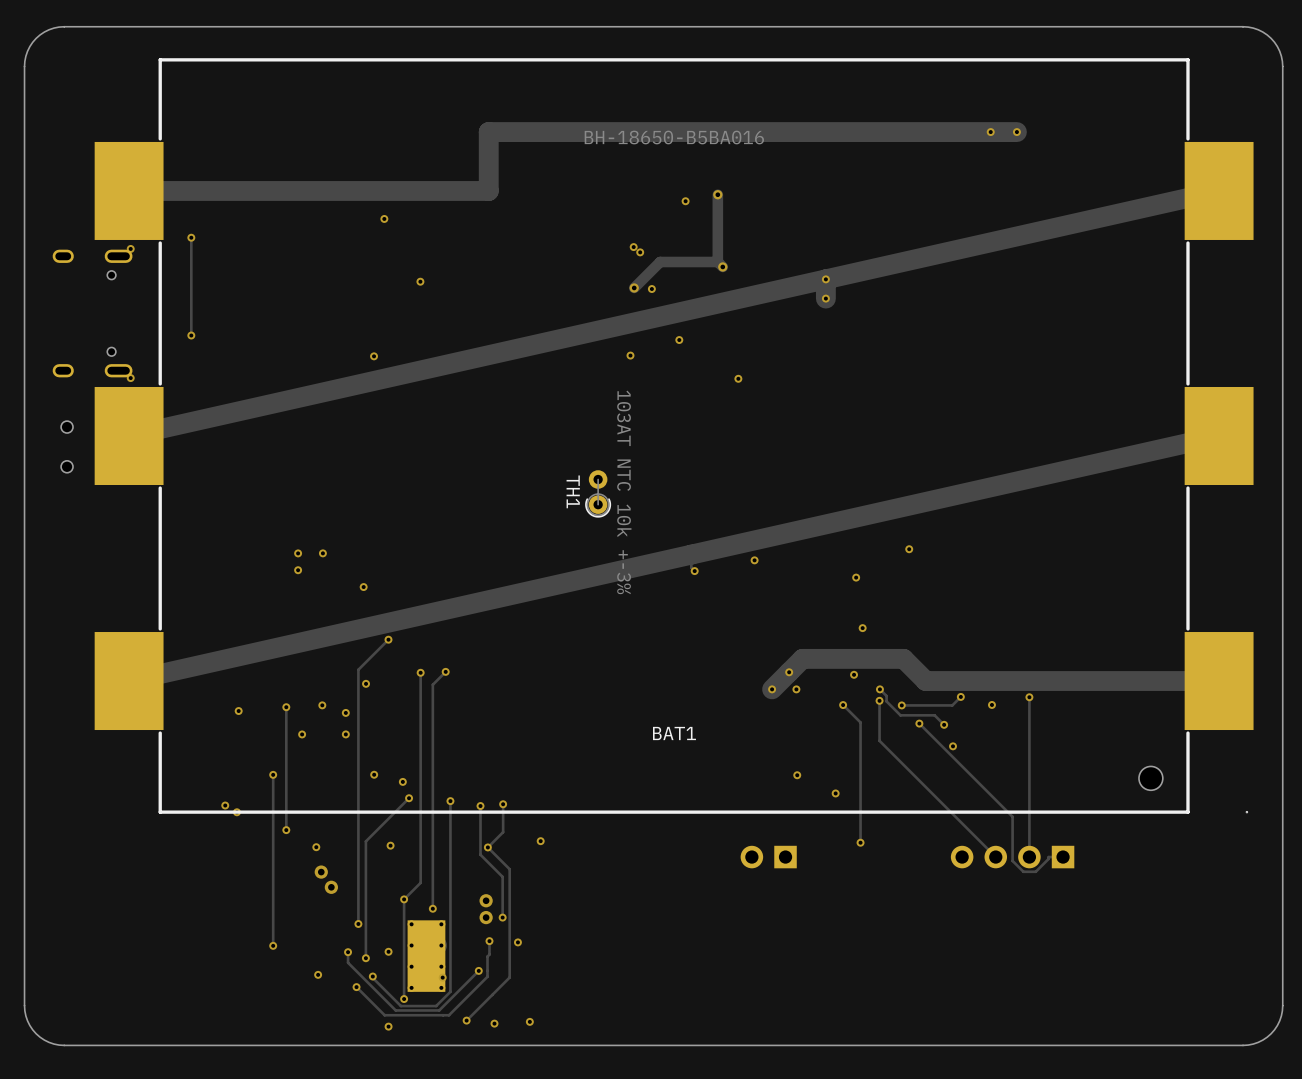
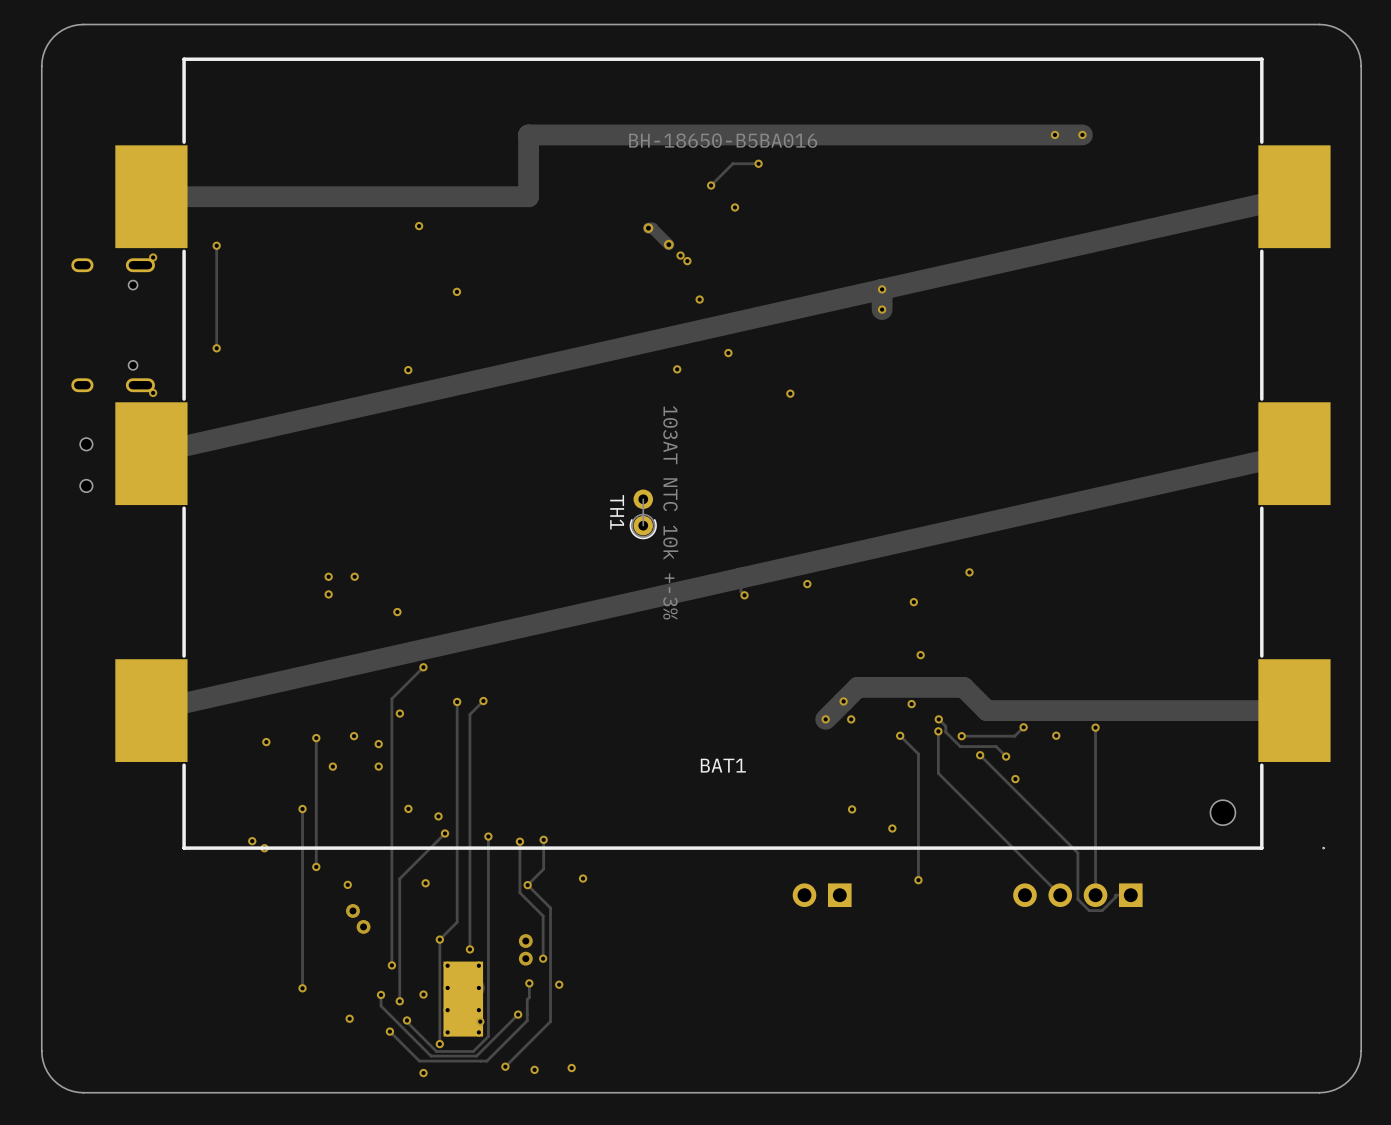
track: none -> (758, 163) (732, 163) (711, 185)
via: none -> (758, 163)
via: none -> (711, 185)
track: (717, 194) (717, 262) -> none
via: (717, 194) -> none
track: none -> (648, 228) (652, 228) (668, 244)
via: none -> (648, 228)
via: none -> (668, 244)
track: (717, 262) (660, 262) (634, 287) -> none
via: (722, 266) -> none
via: (634, 287) -> none

